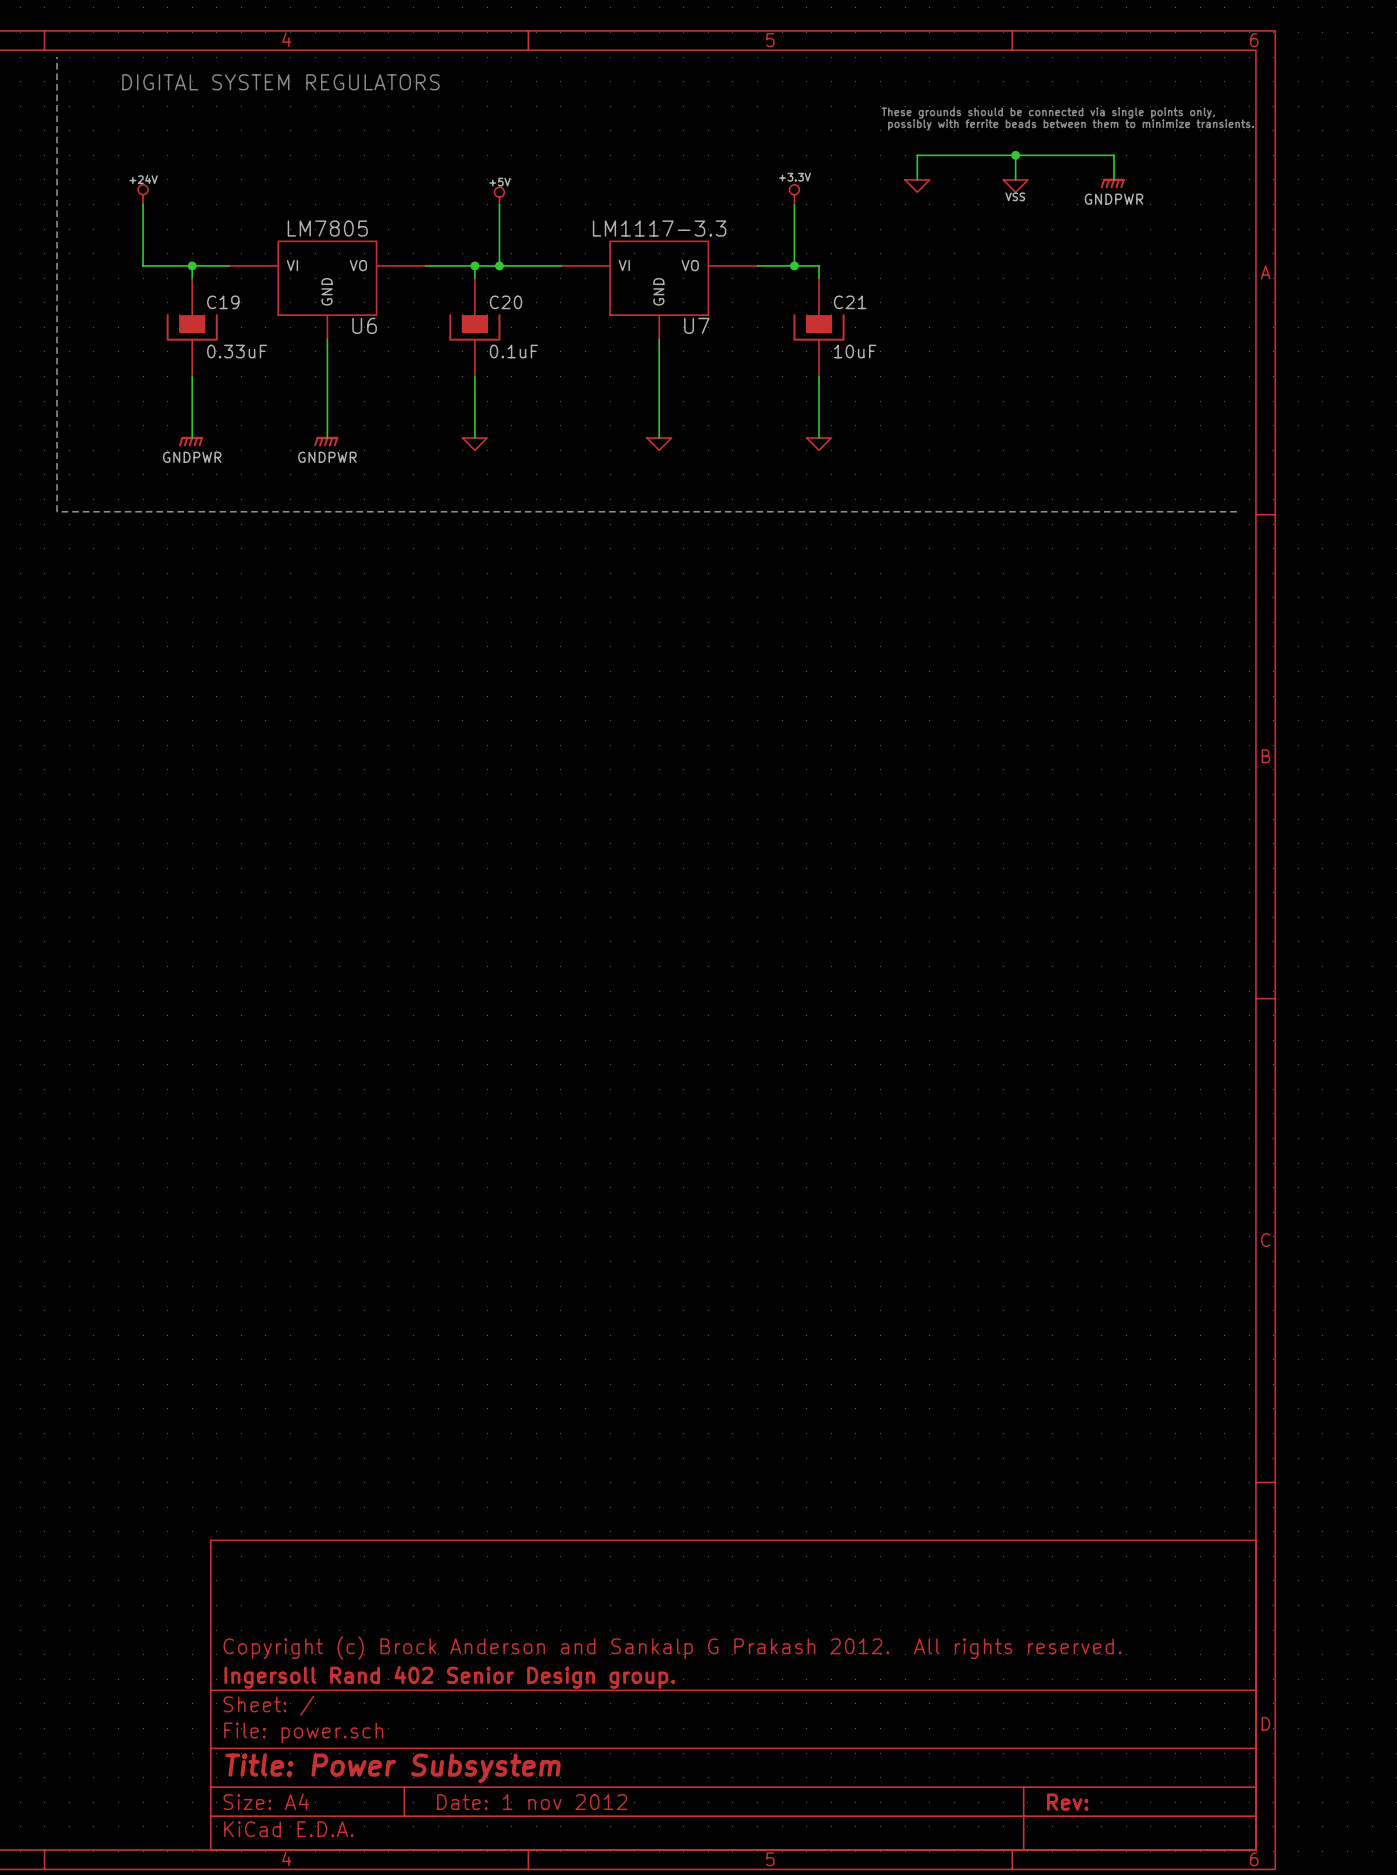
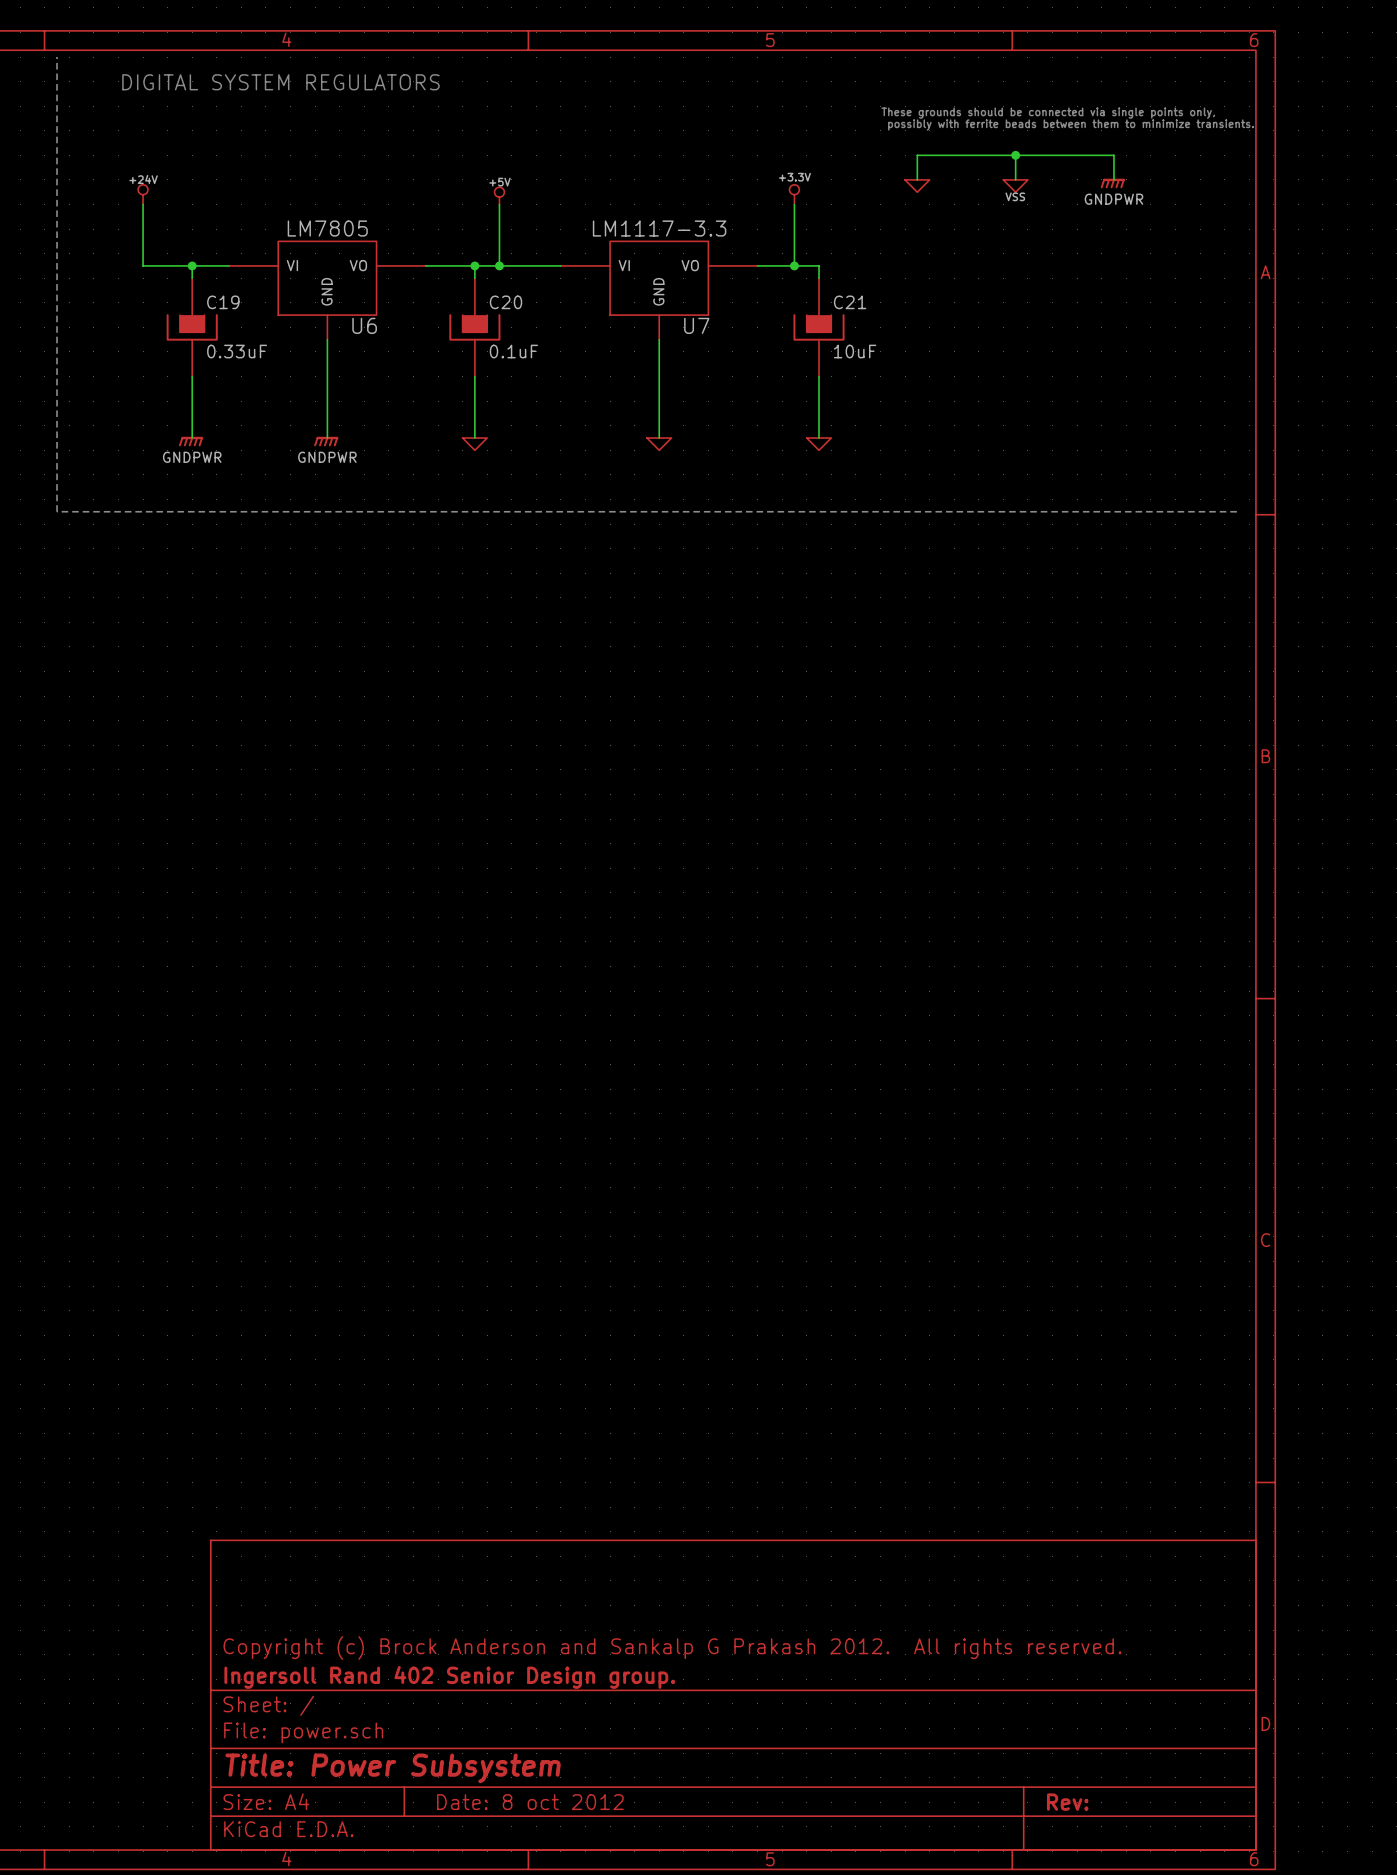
title block: Date: 1 nov 2012 (532, 1802) -> Date: 8 oct 2012 (530, 1802)

